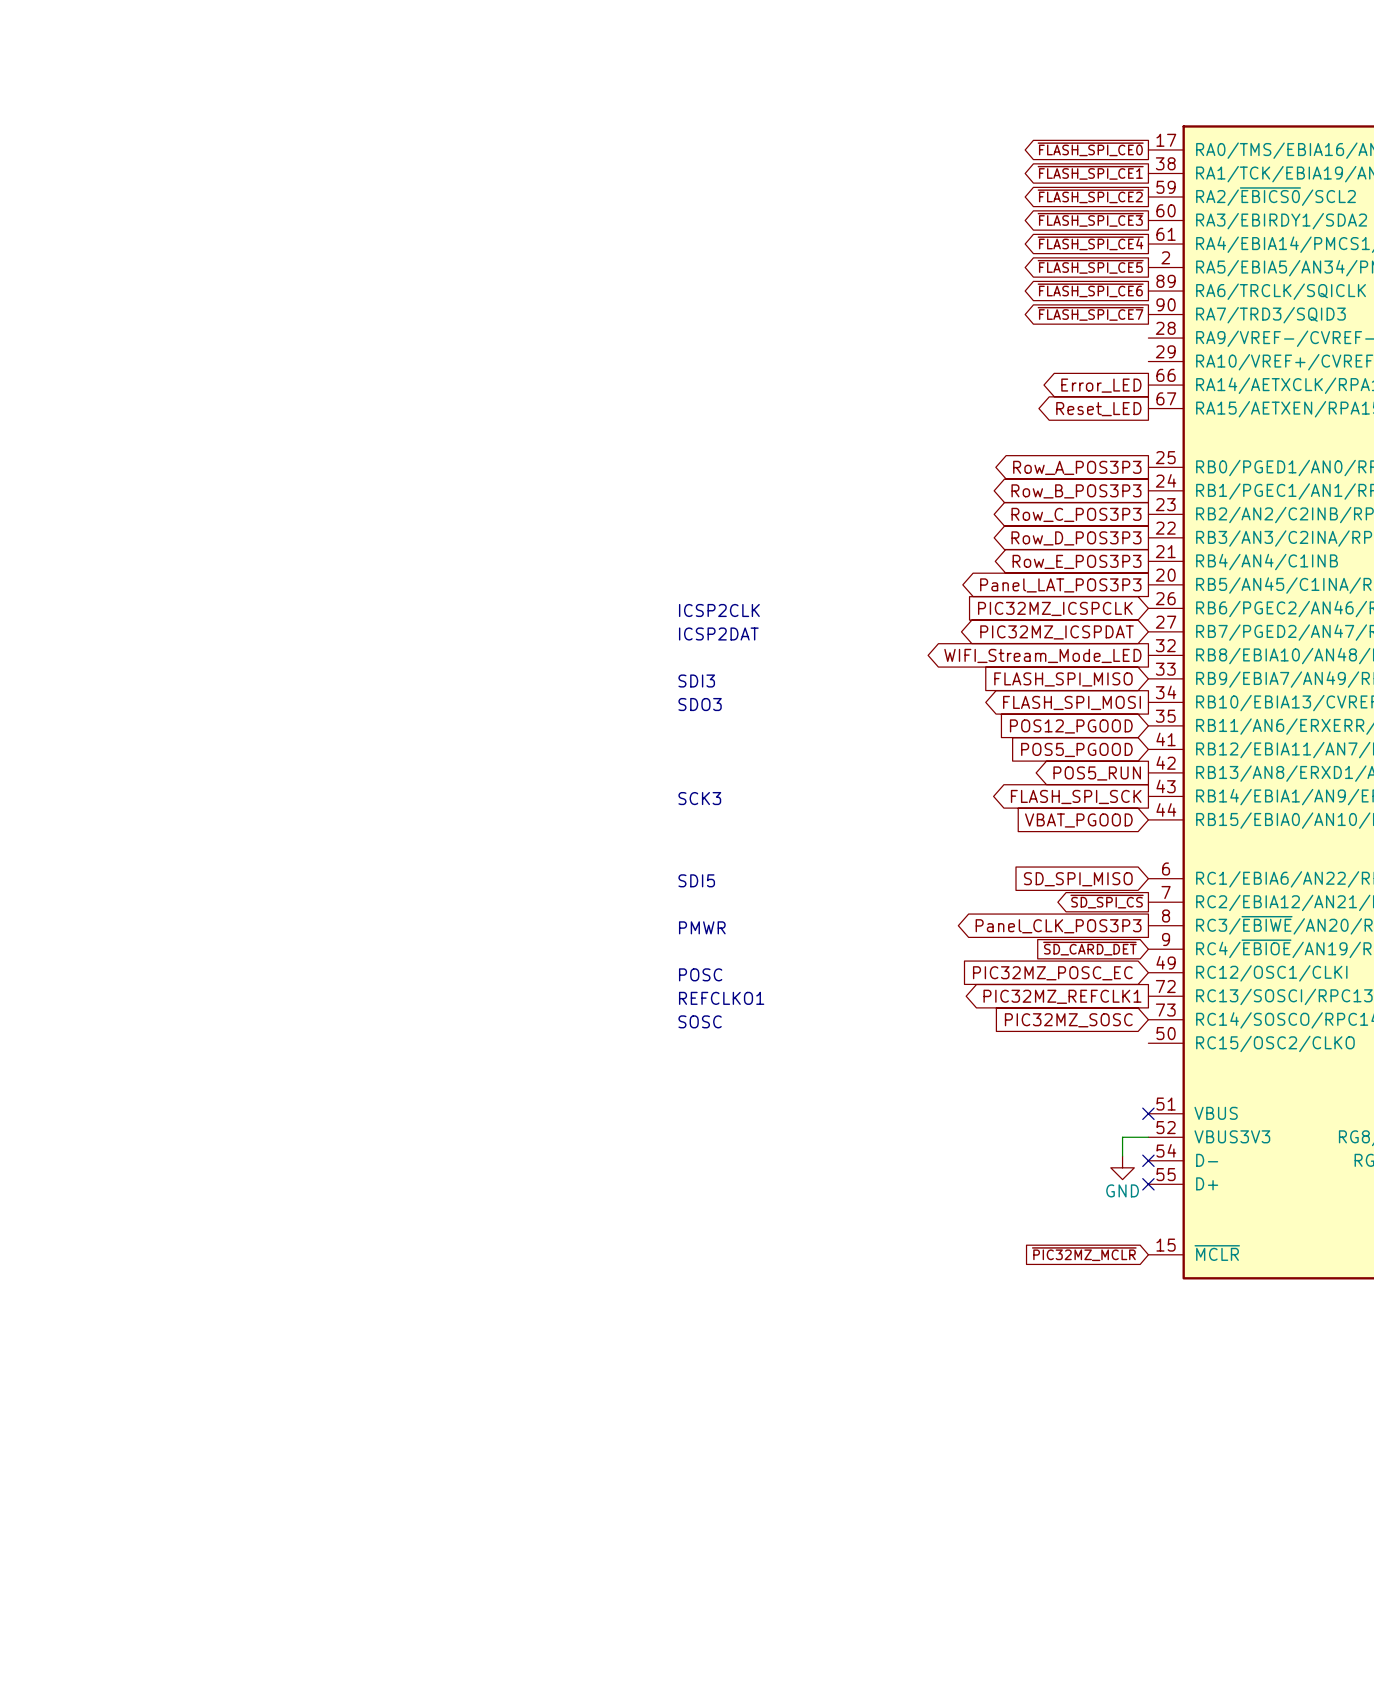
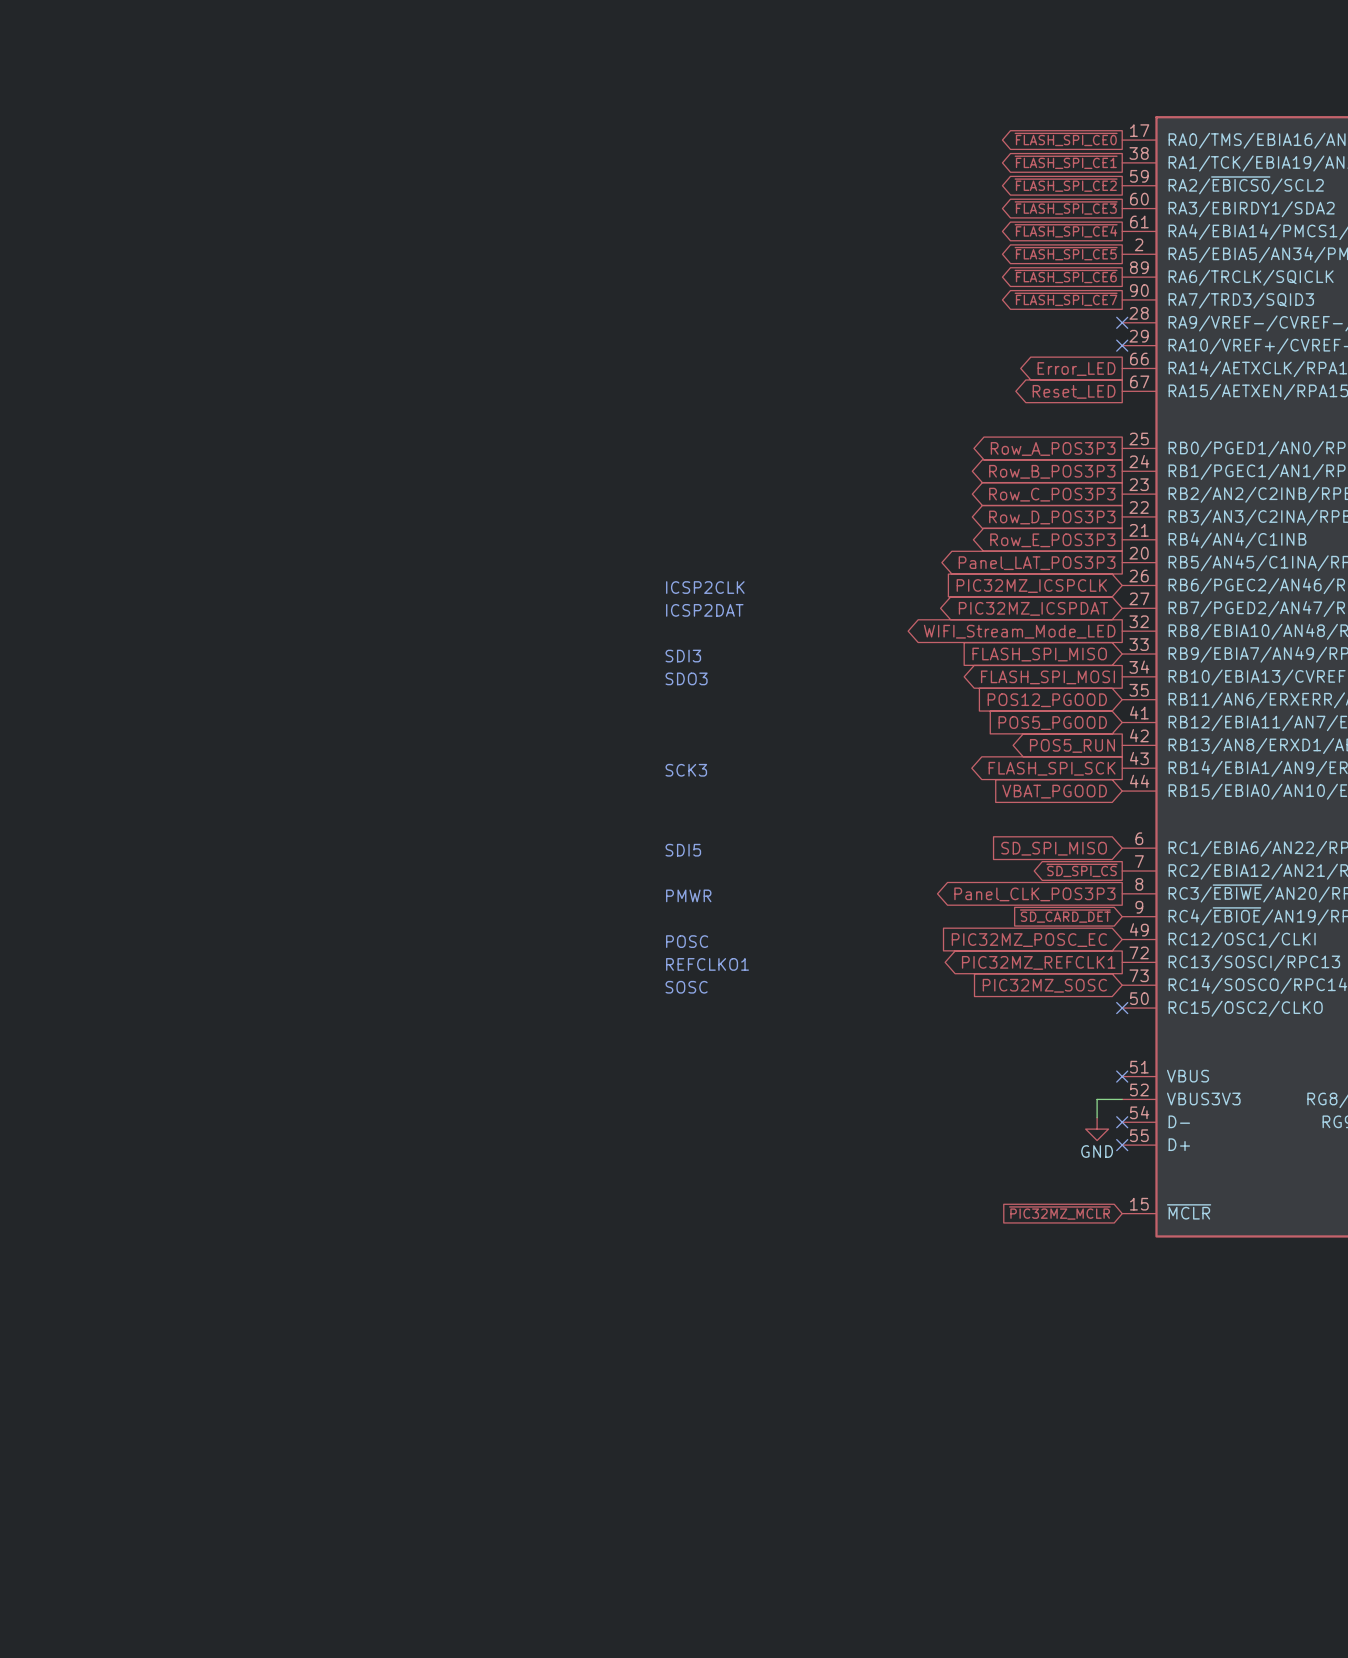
no-connect mark: none -> (1122, 322)
no-connect mark: none -> (1122, 345)
no-connect mark: none -> (1122, 1008)

